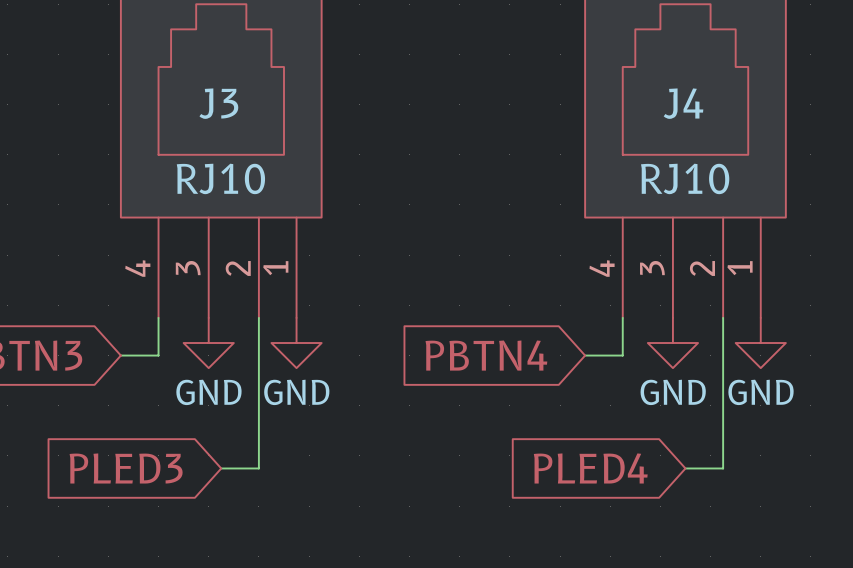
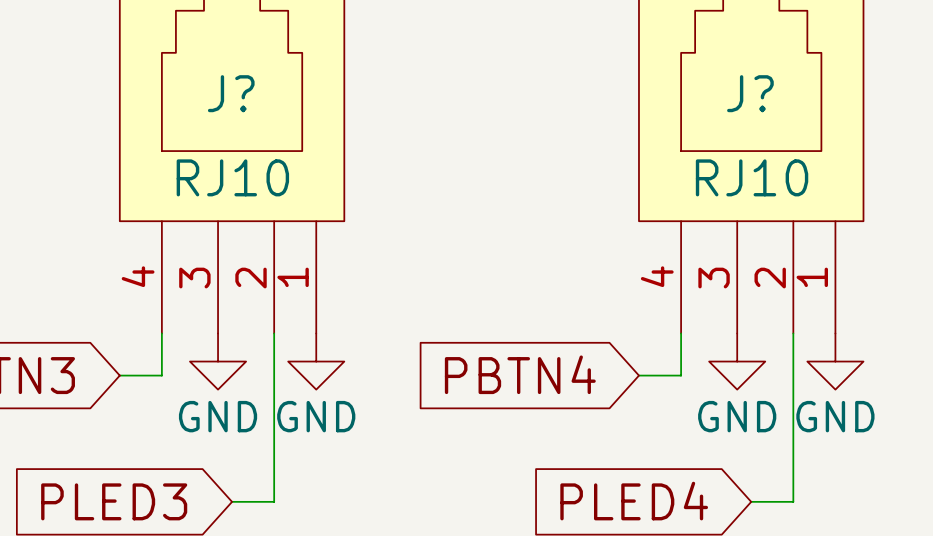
J3 name: J3 (218, 103) -> J? (231, 93)
J4 name: J4 (683, 103) -> J? (750, 93)

